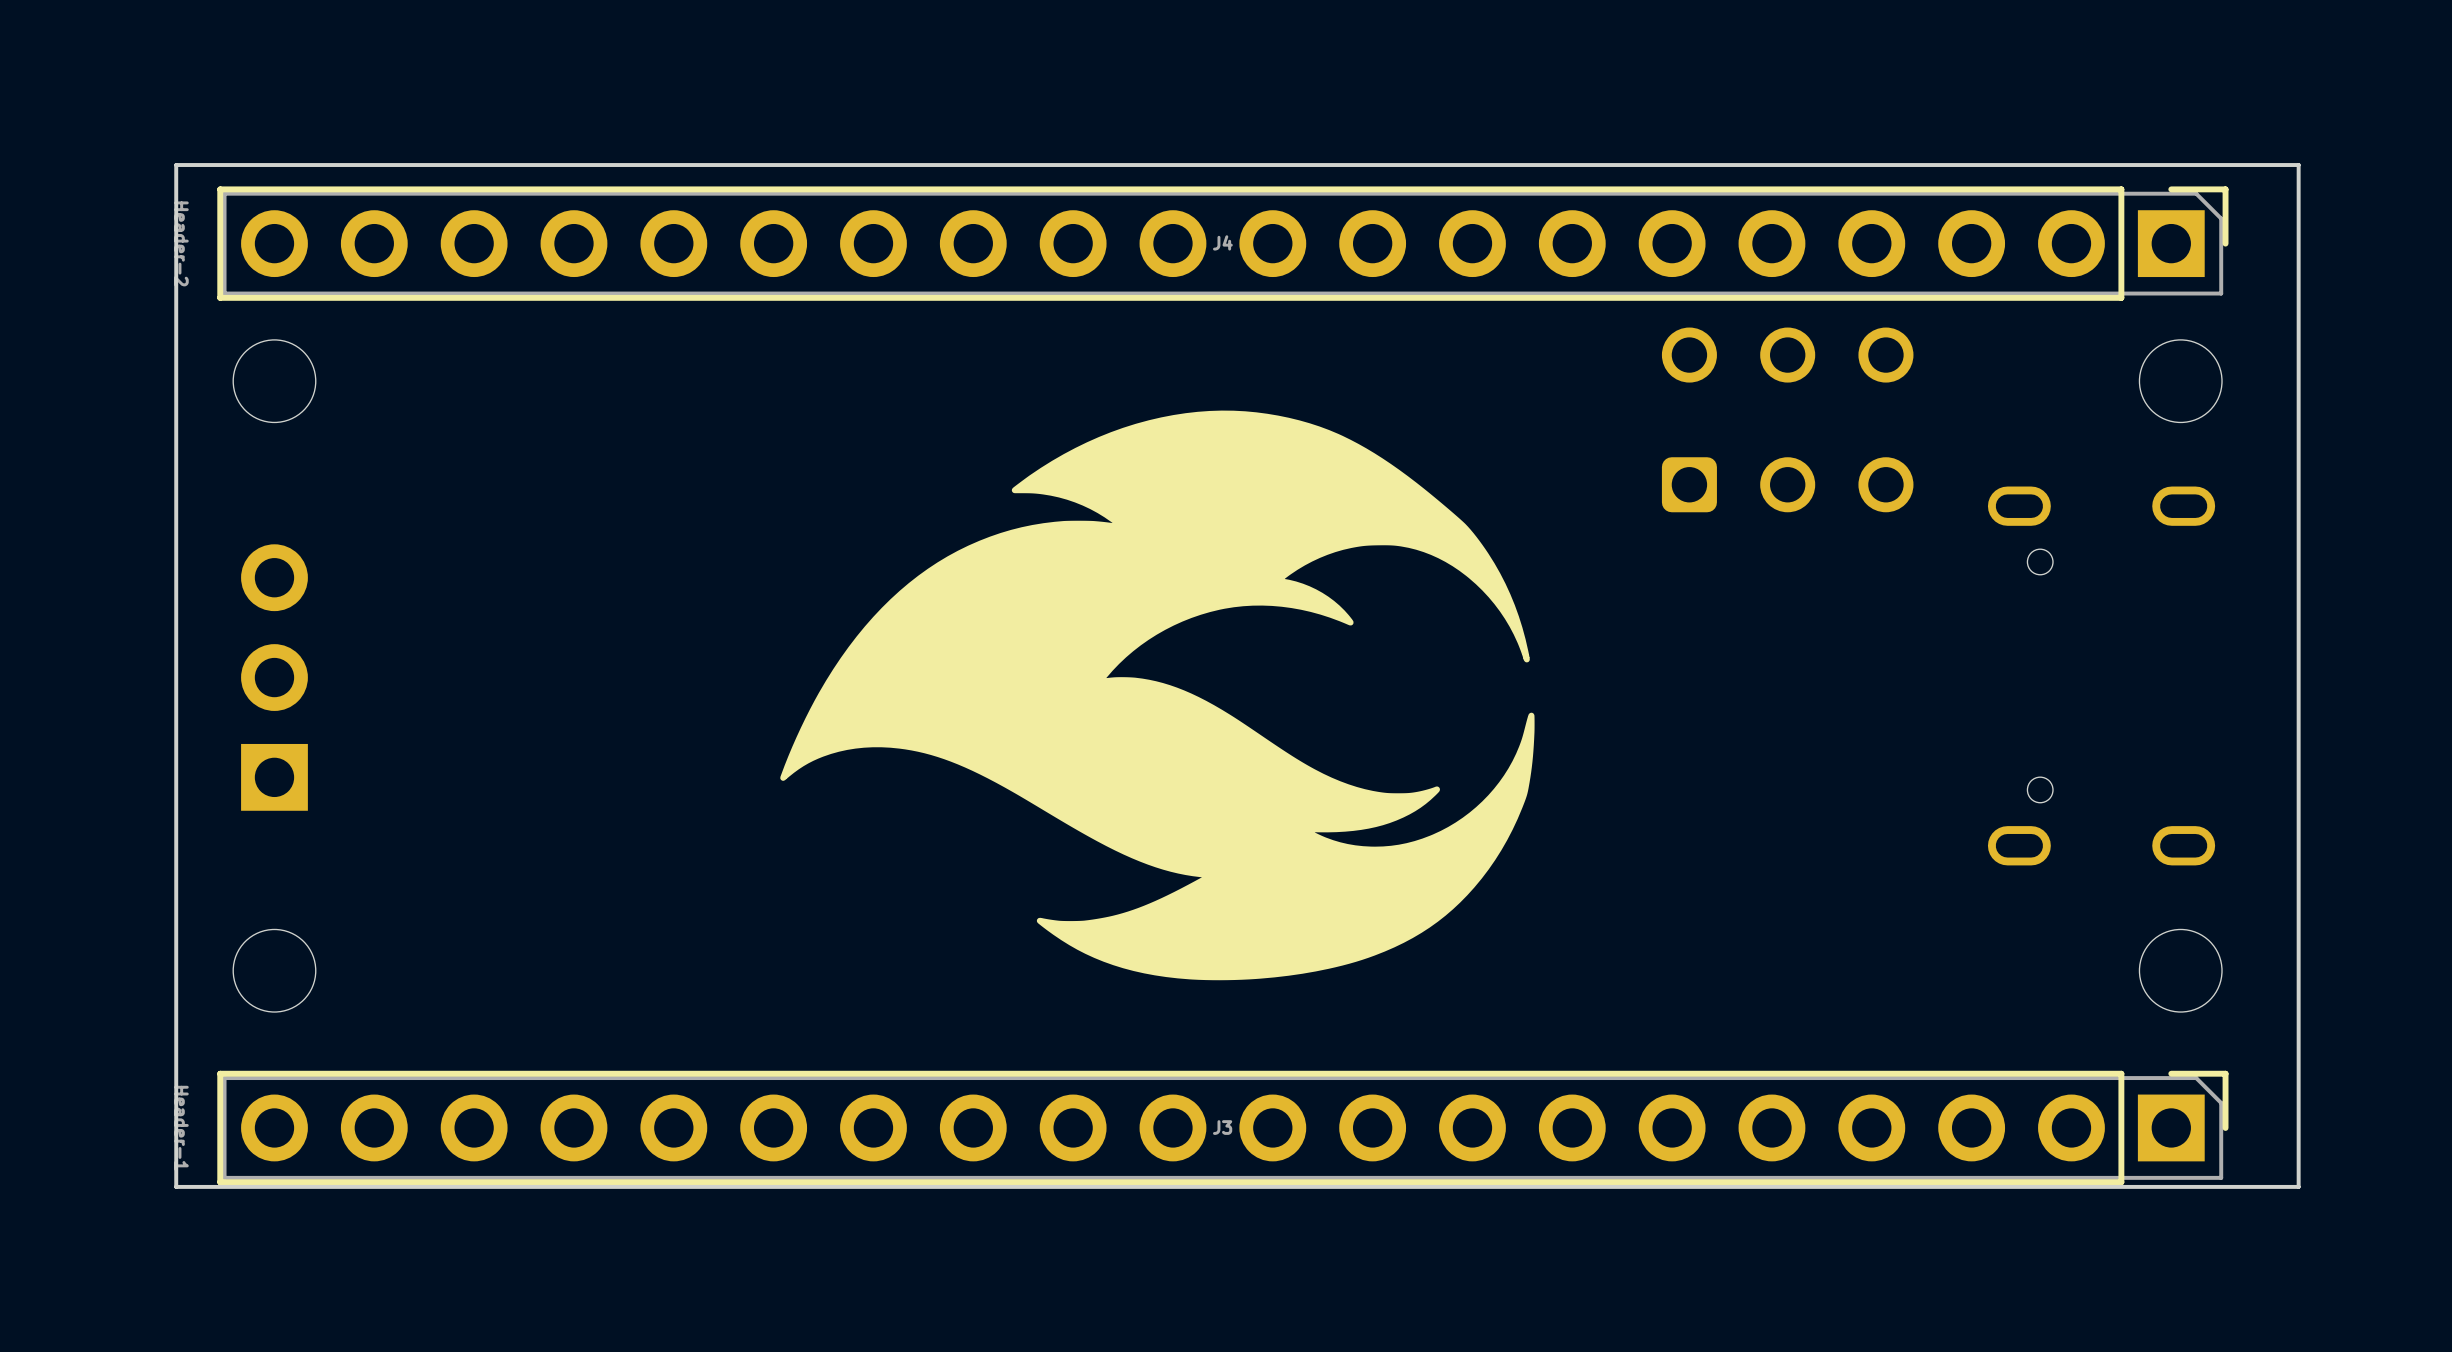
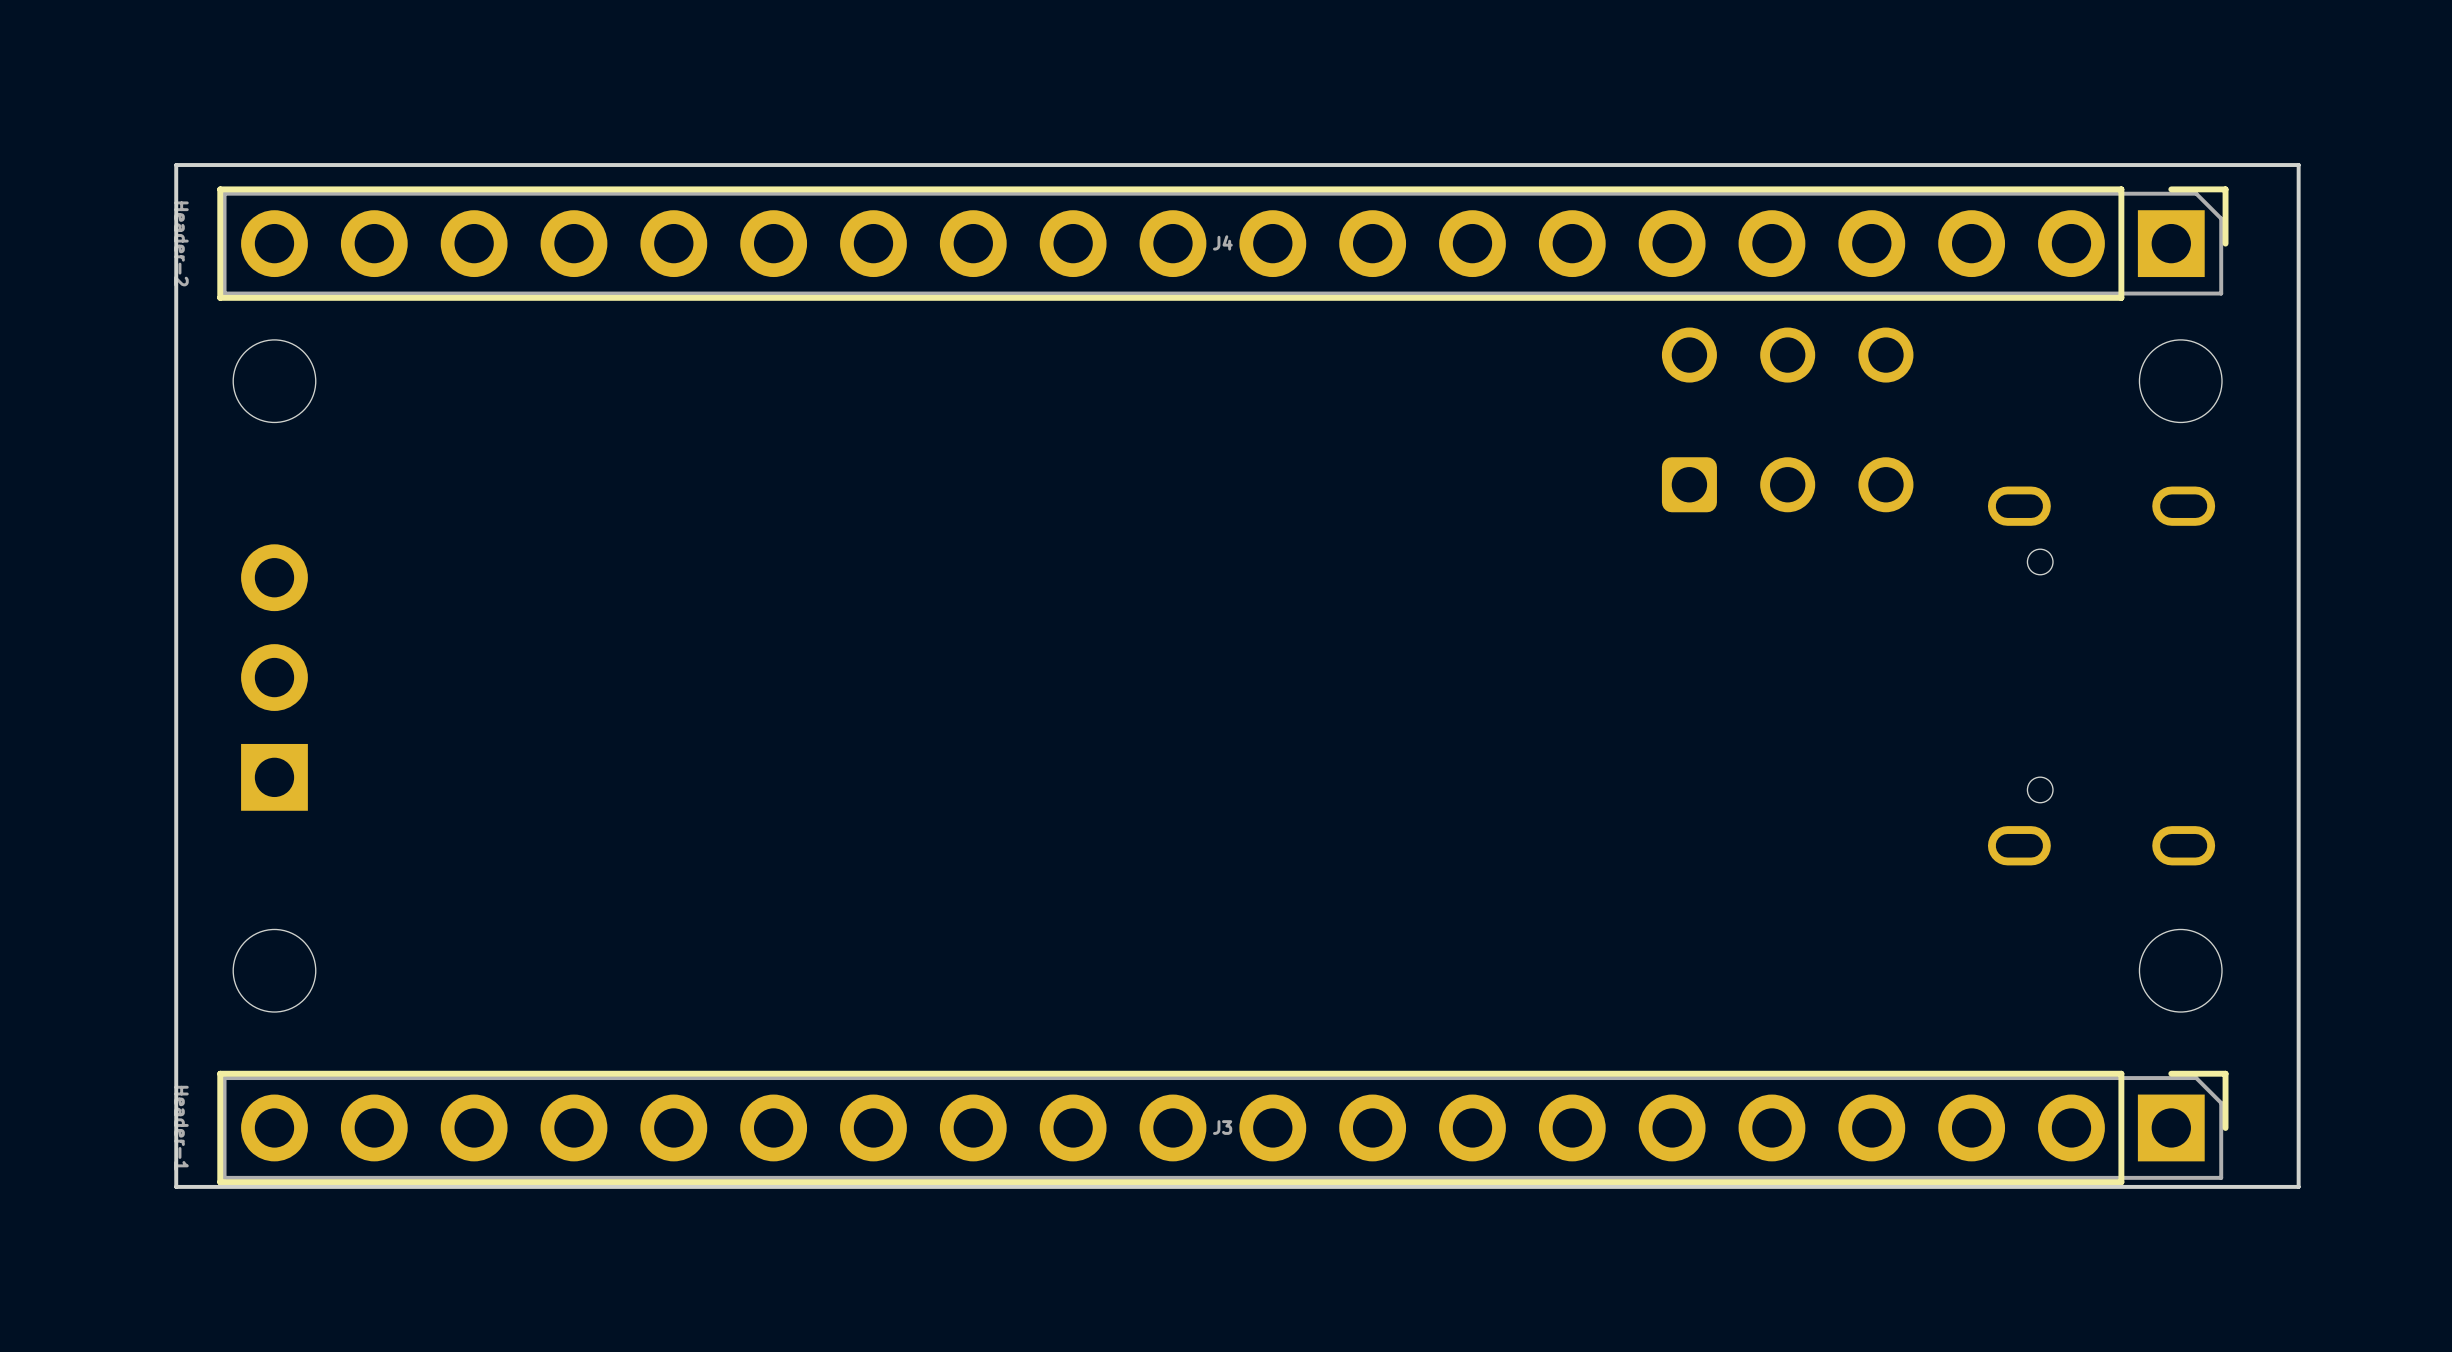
drawing: [780, 410, 1535, 981] -> none

